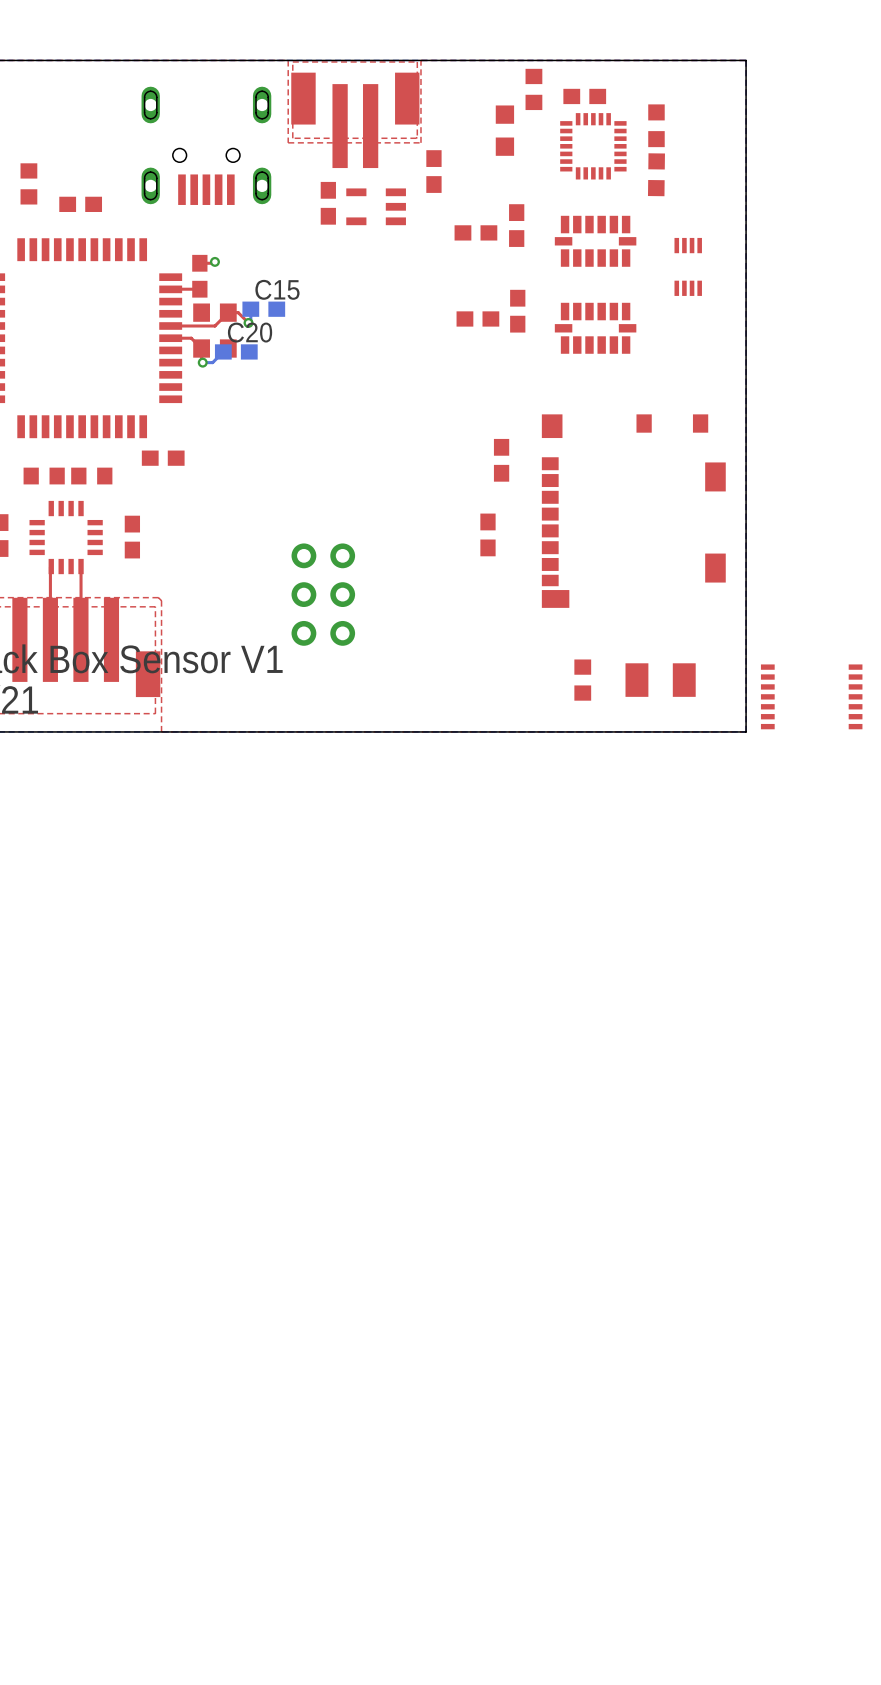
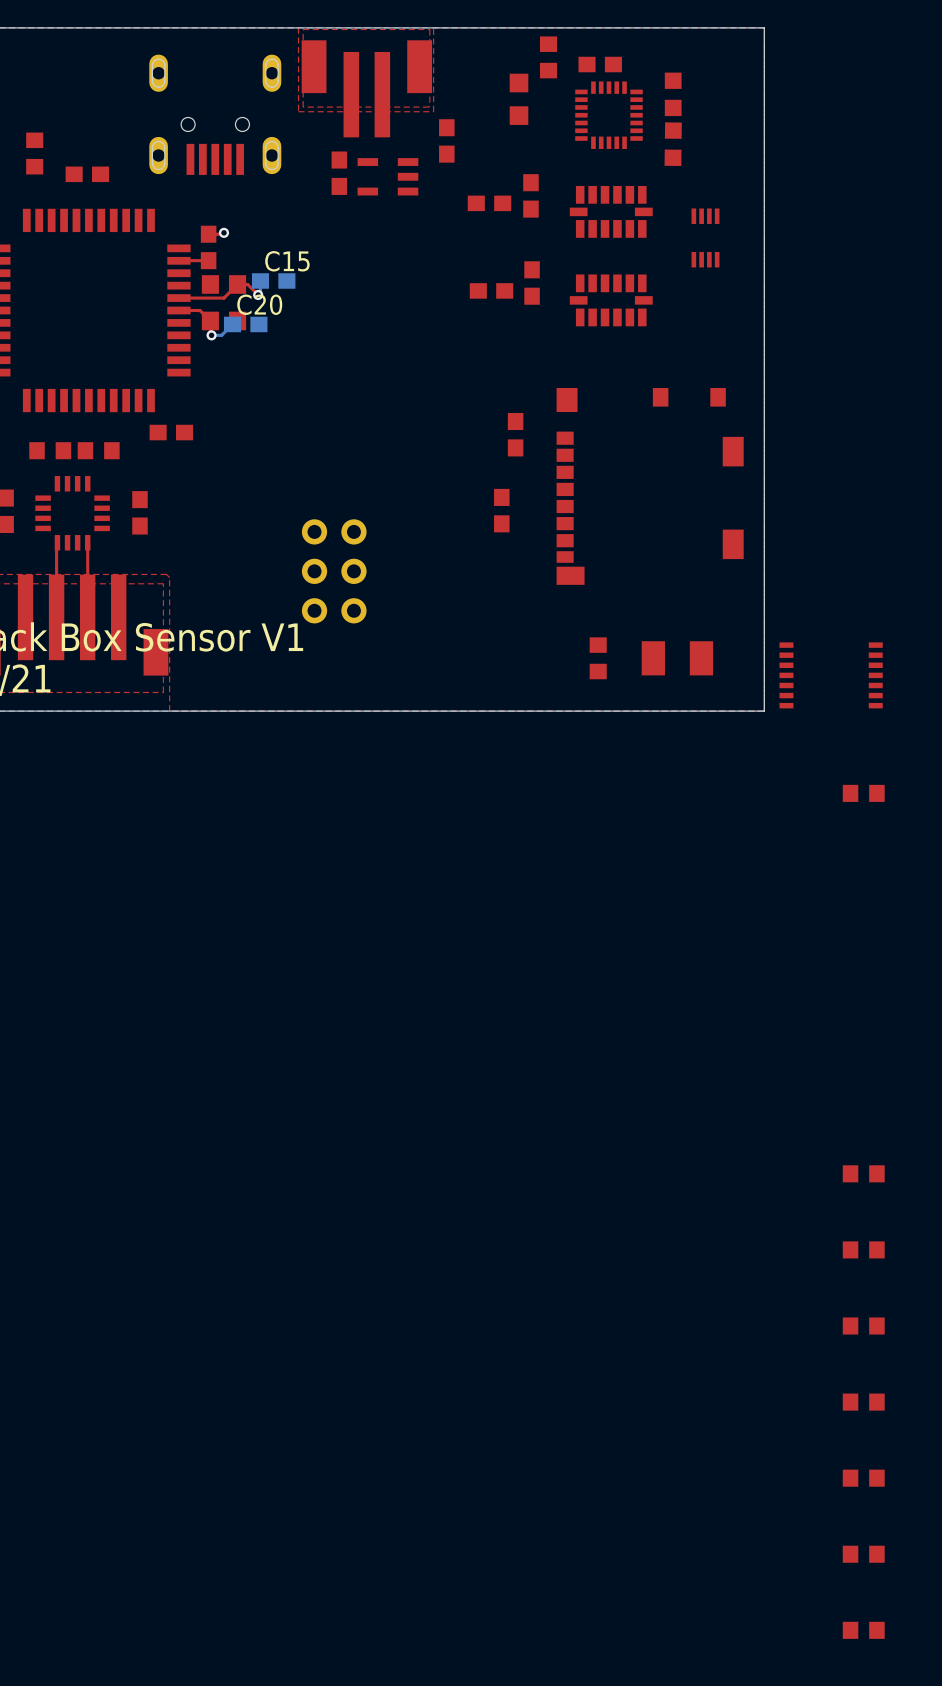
part: none -> (863, 793)
part: none -> (863, 1173)
part: none -> (863, 1249)
part: none -> (863, 1326)
part: none -> (863, 1402)
part: none -> (863, 1478)
part: none -> (863, 1554)
part: none -> (863, 1630)

